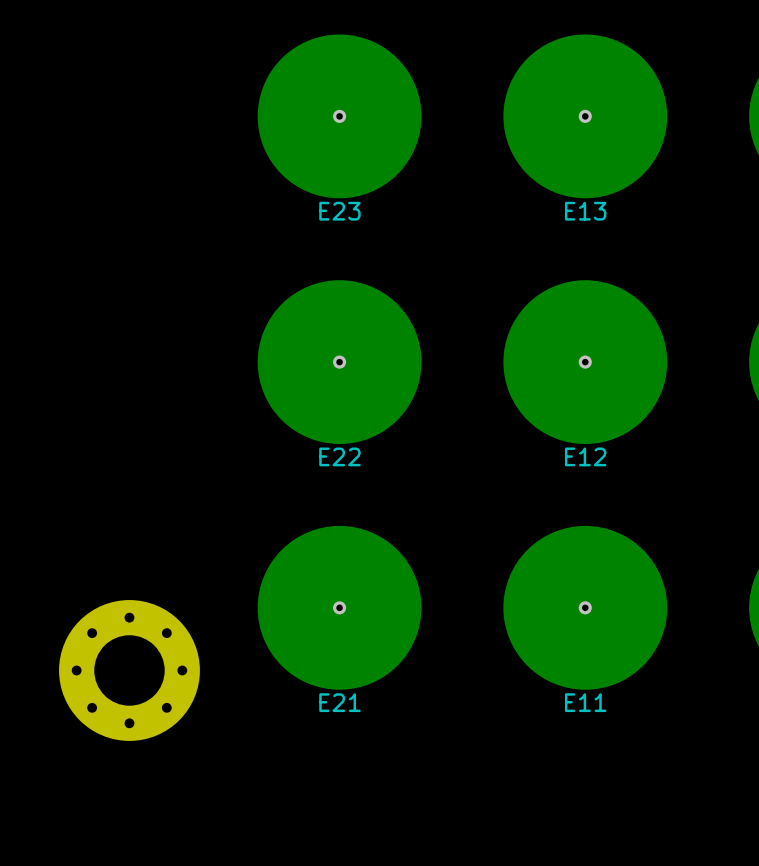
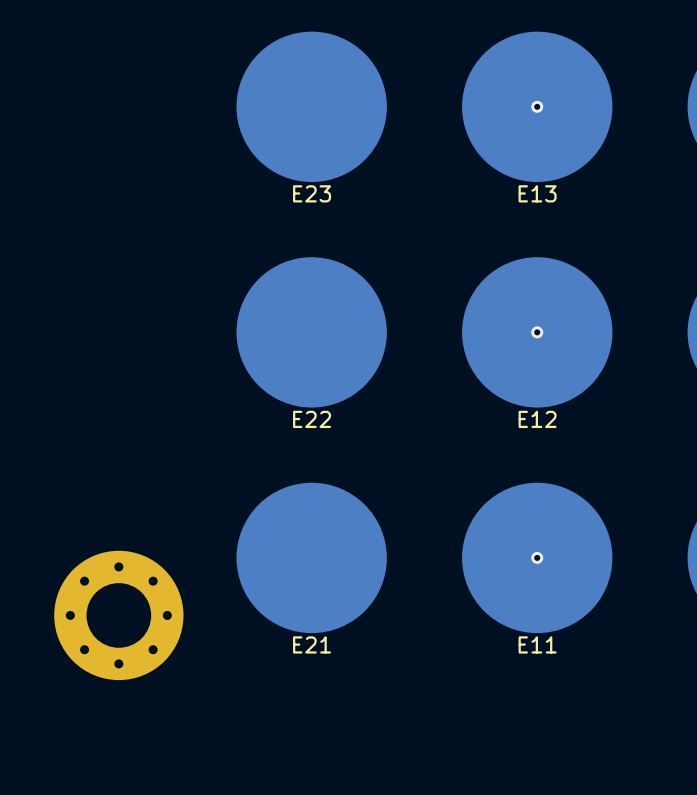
via: (339, 116) -> none
via: (339, 362) -> none
via: (339, 607) -> none

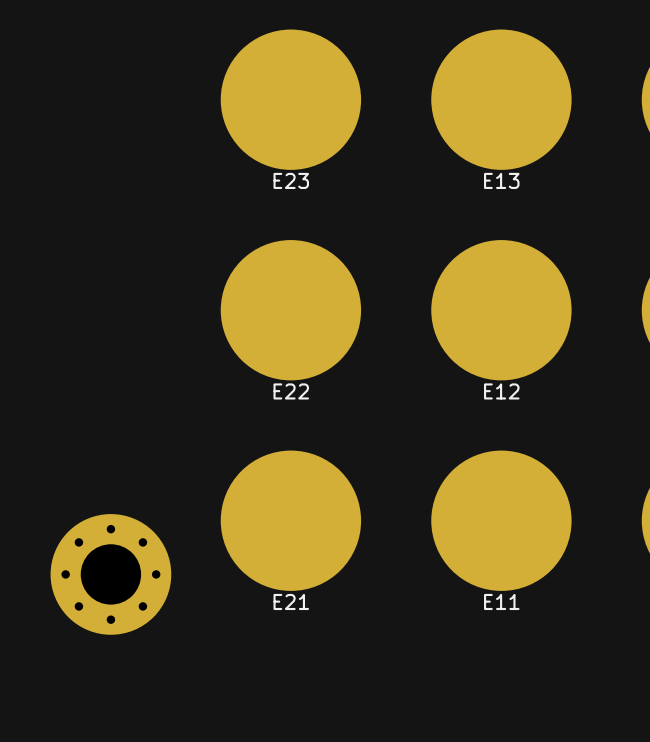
via: (537, 106) -> none
via: (537, 332) -> none
via: (537, 557) -> none

